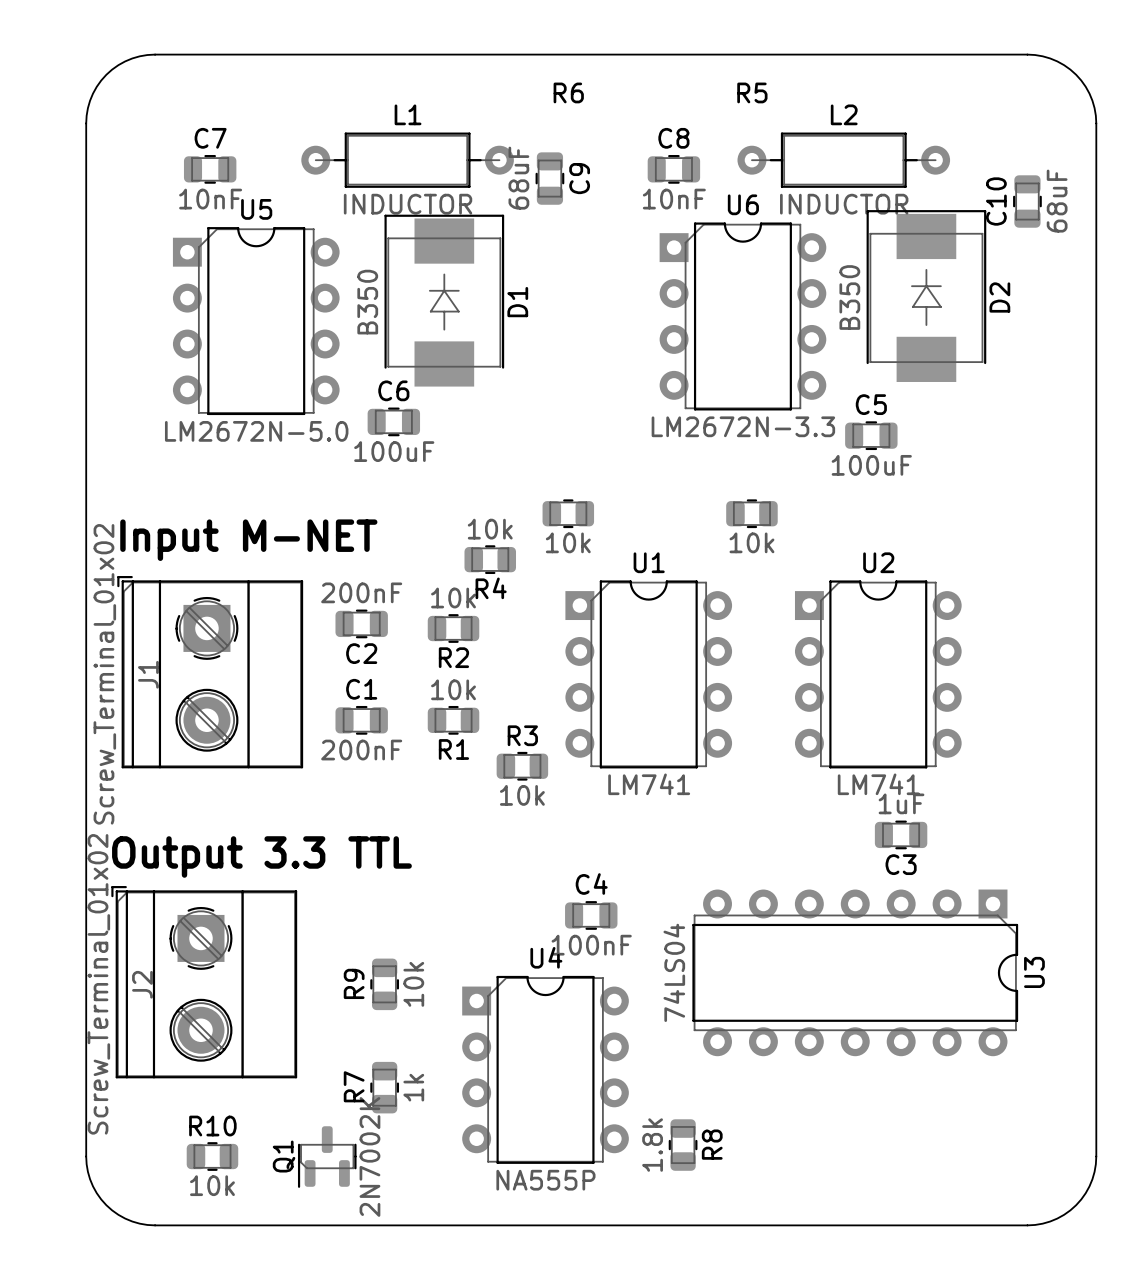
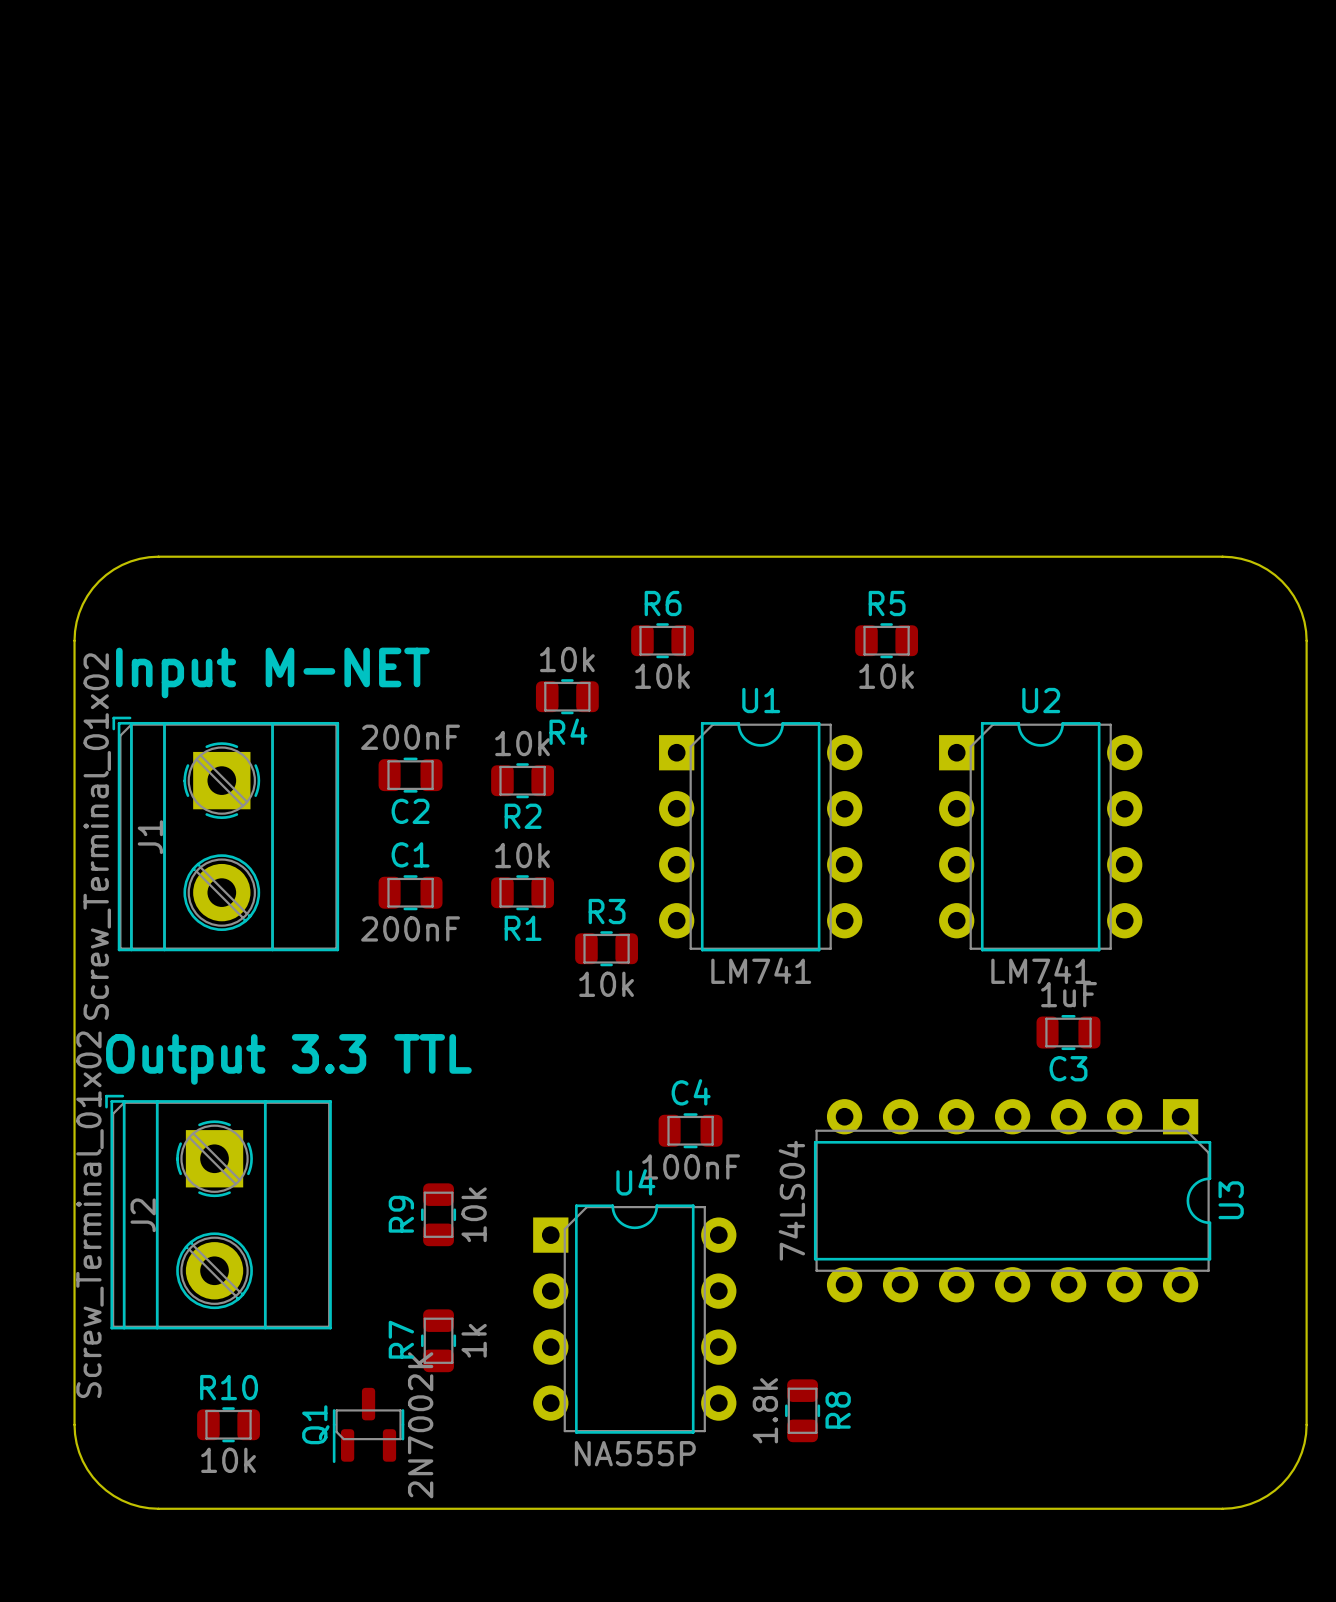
R6 name position: R6 (568, 92) -> R6 (663, 603)
R5 name position: R5 (752, 92) -> R5 (887, 603)
L1: INDUCTOR (407, 160) -> none
L2: INDUCTOR (843, 160) -> none
C7: 10nF (210, 169) -> none
C8: 10nF (673, 169) -> none
C9: 68uF (549, 178) -> none
C10: 68uF (1027, 201) -> none
D2: B350 (926, 296) -> none
D1: B350 (444, 300) -> none
U6: LM2672N-3.3 (742, 316) -> none
U5: LM2672N-5.0 (256, 321) -> none
C6: 100uF (393, 421) -> none
C5: 100uF (871, 435) -> none
board edge: (86, 513) (86, 115) (93, 93) (106, 74) (125, 61) (139, 56) (155, 54) (1027, 54) (1042, 56) (1057, 61) (1070, 69) (1081, 80) (1092, 100) (1095, 115) (1096, 513) -> (74, 640) (76, 622) (82, 604) (99, 581) (122, 565) (139, 558) (158, 556) (1232, 557) (1259, 565) (1274, 575) (1288, 588) (1301, 612) (1306, 640)

